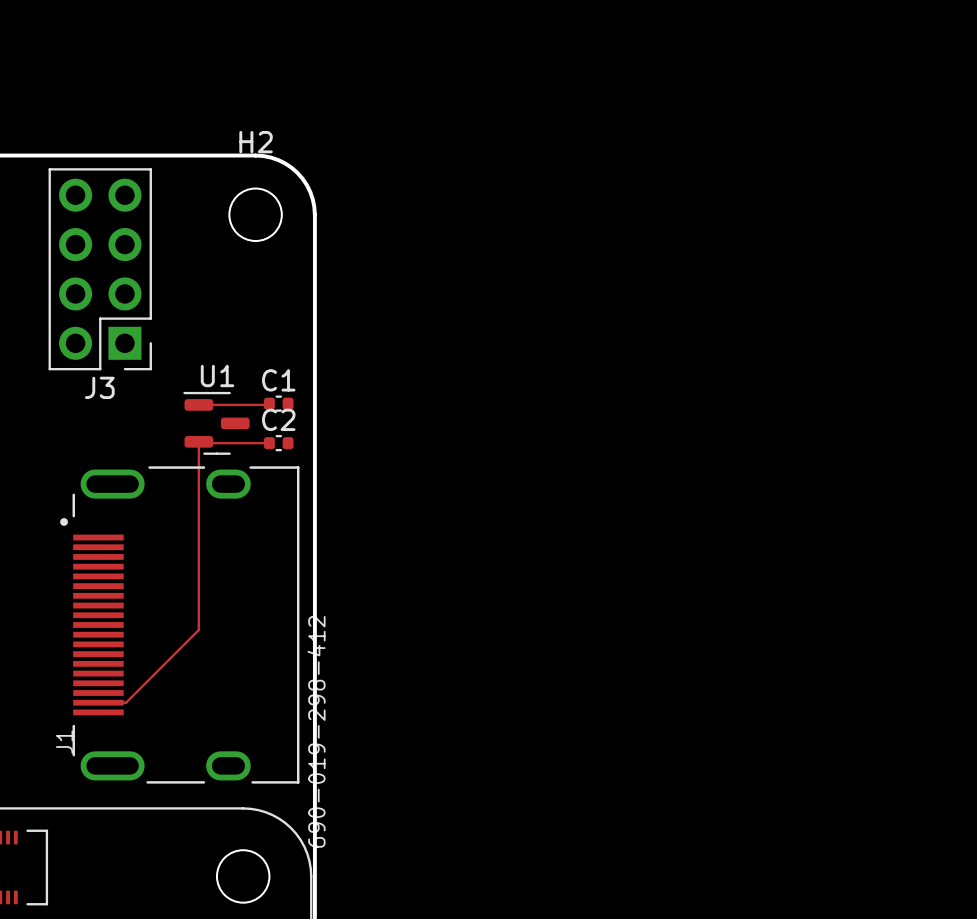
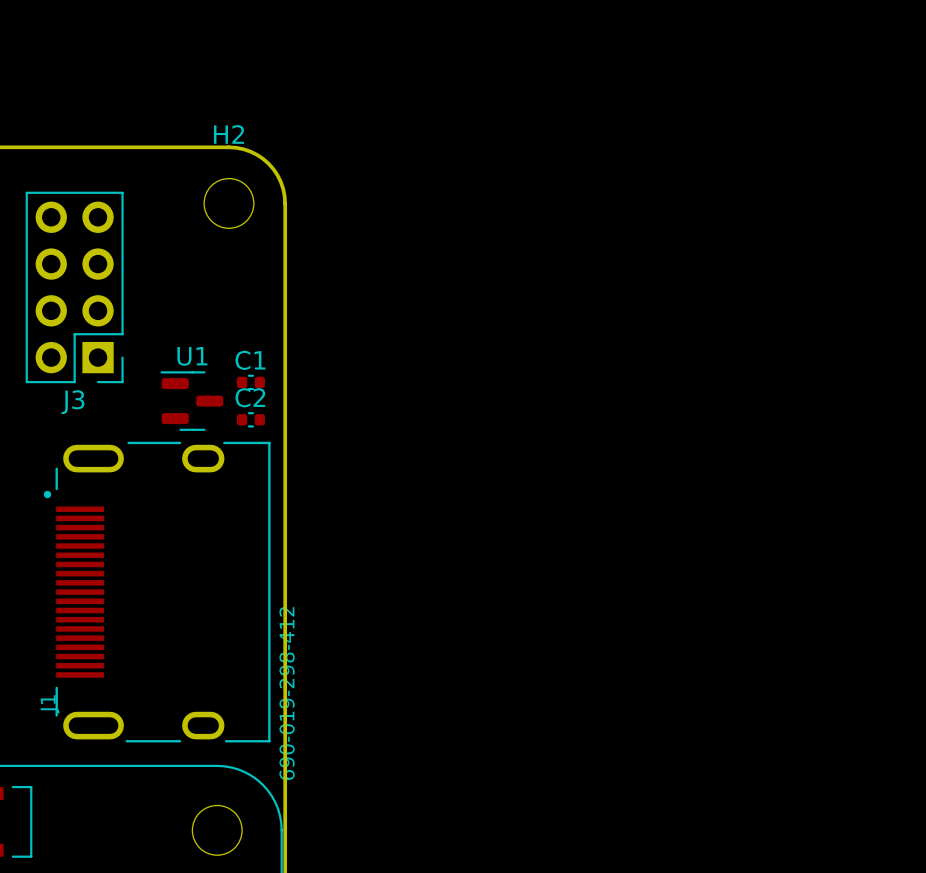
J3 position: (100, 269) -> (74, 287)
track: (269, 403) (198, 404) -> none
track: (269, 443) (198, 441) (198, 630) (126, 702) (98, 702) -> none

